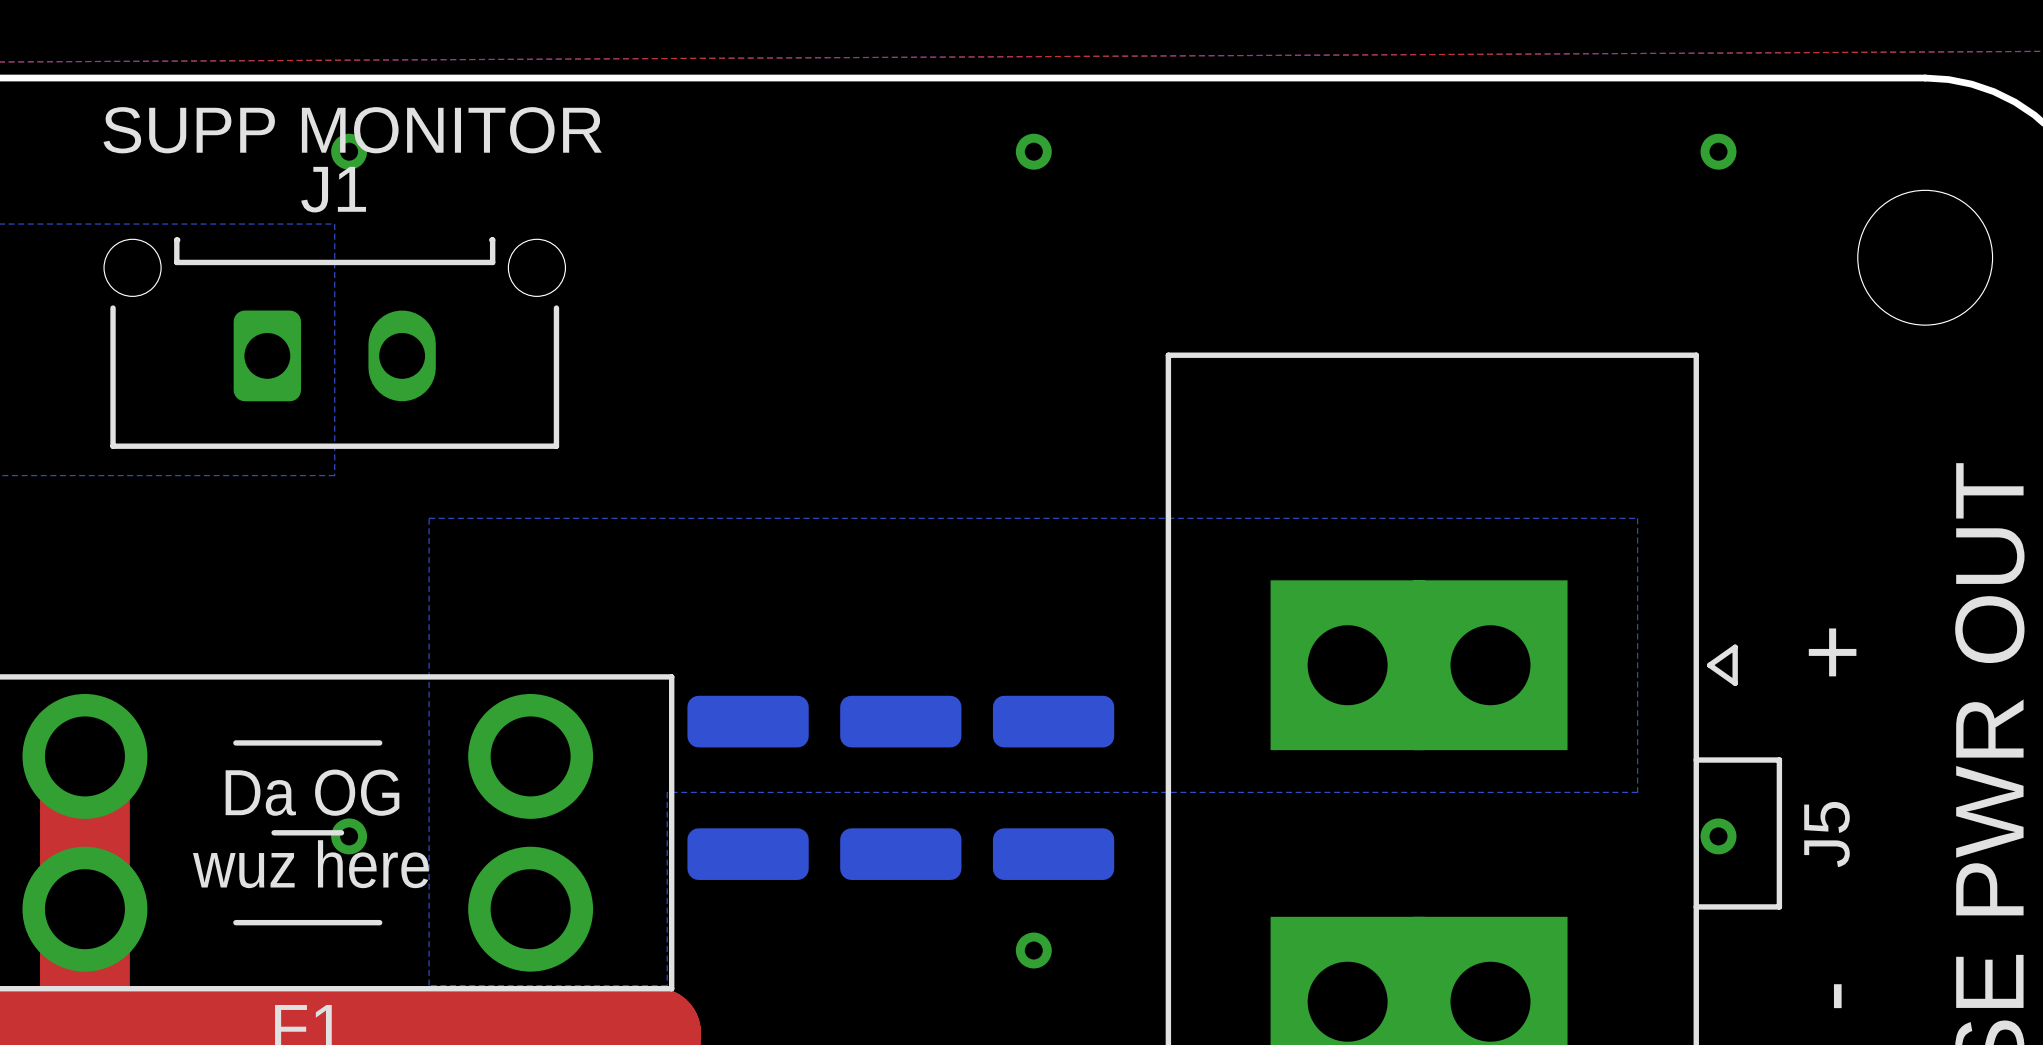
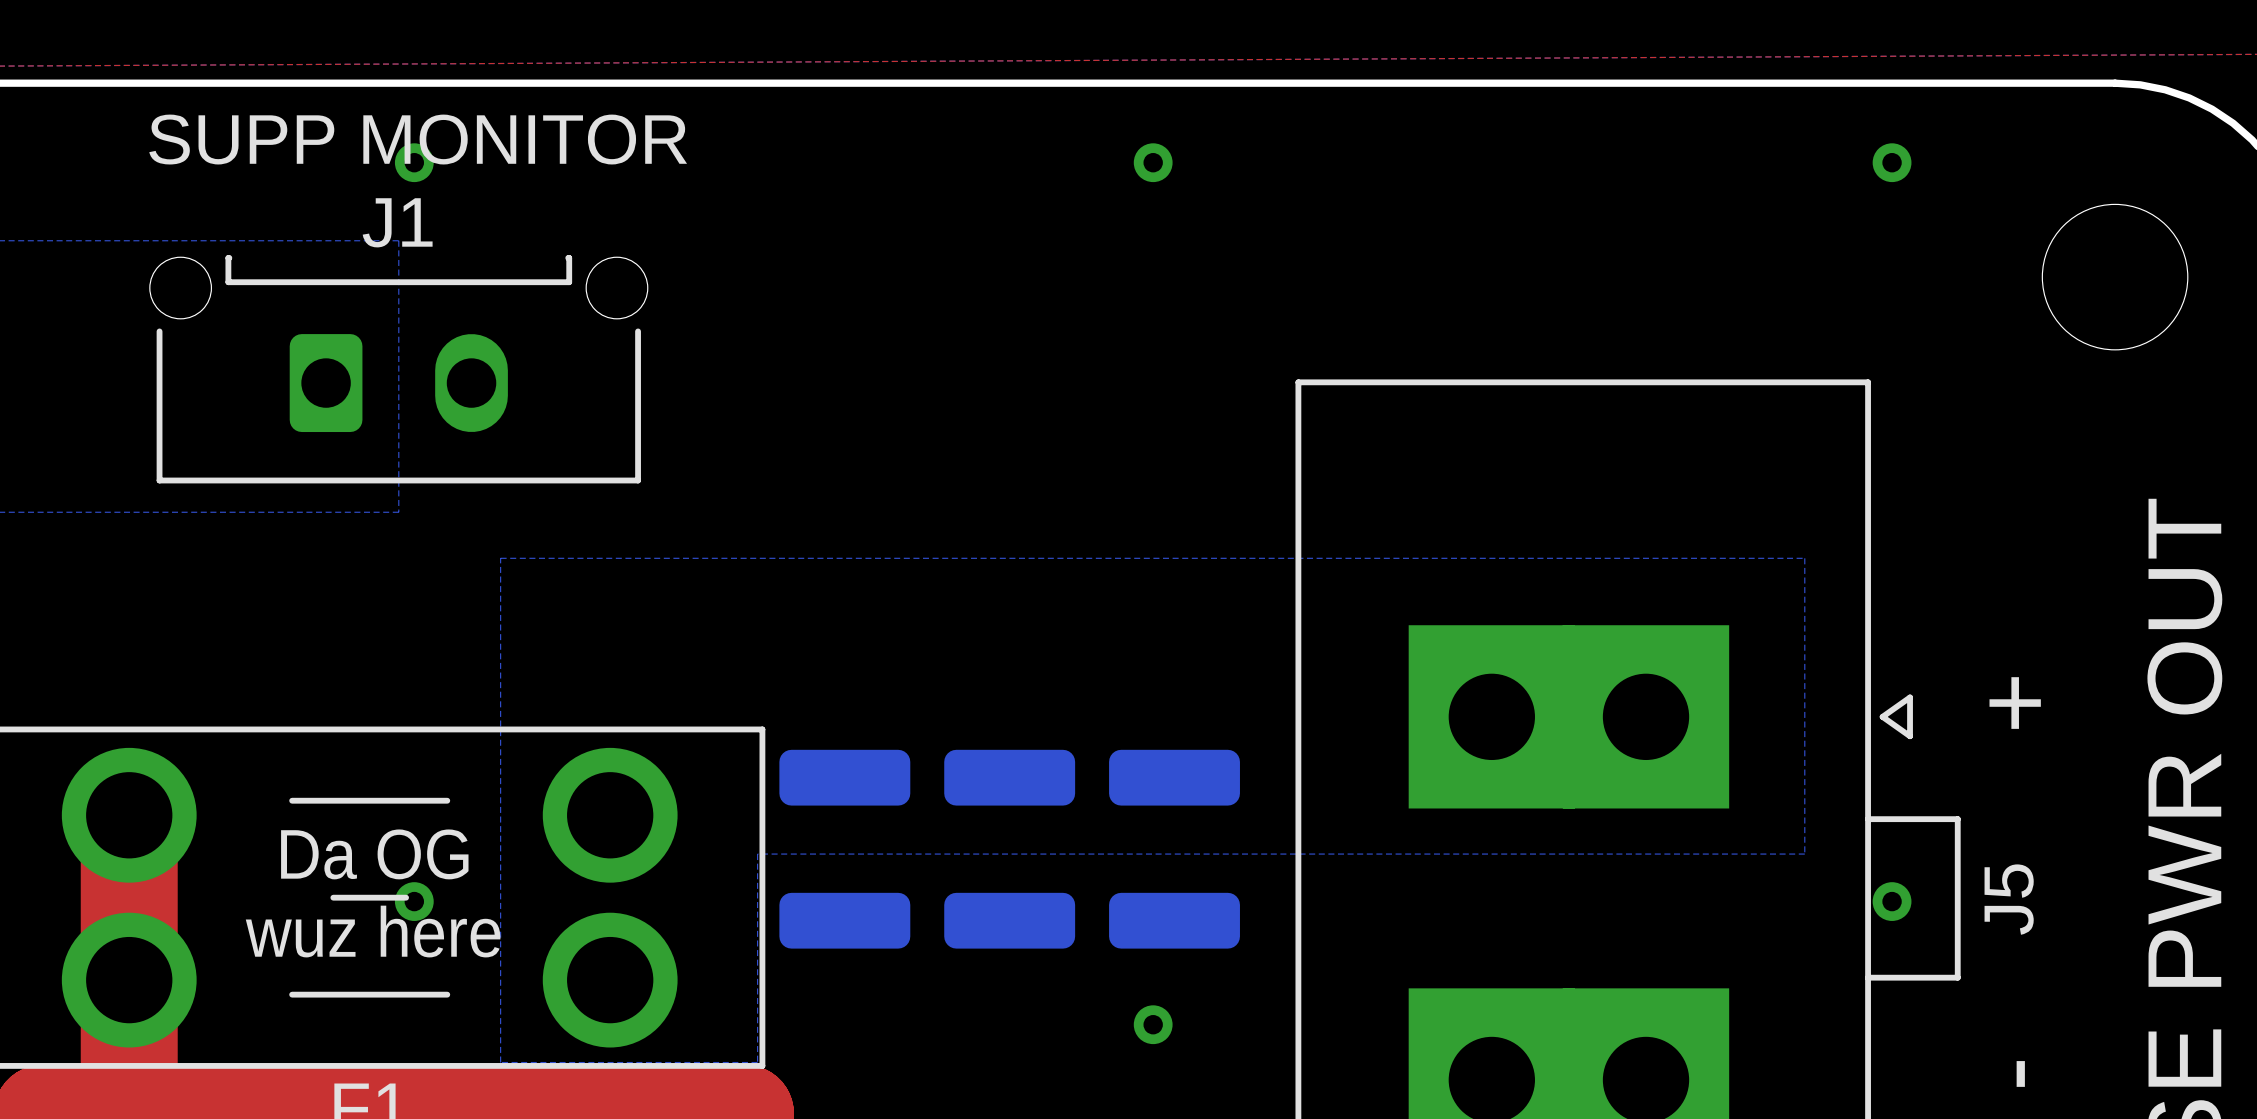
J1 name position: J1 (333, 189) -> J1 (397, 222)

